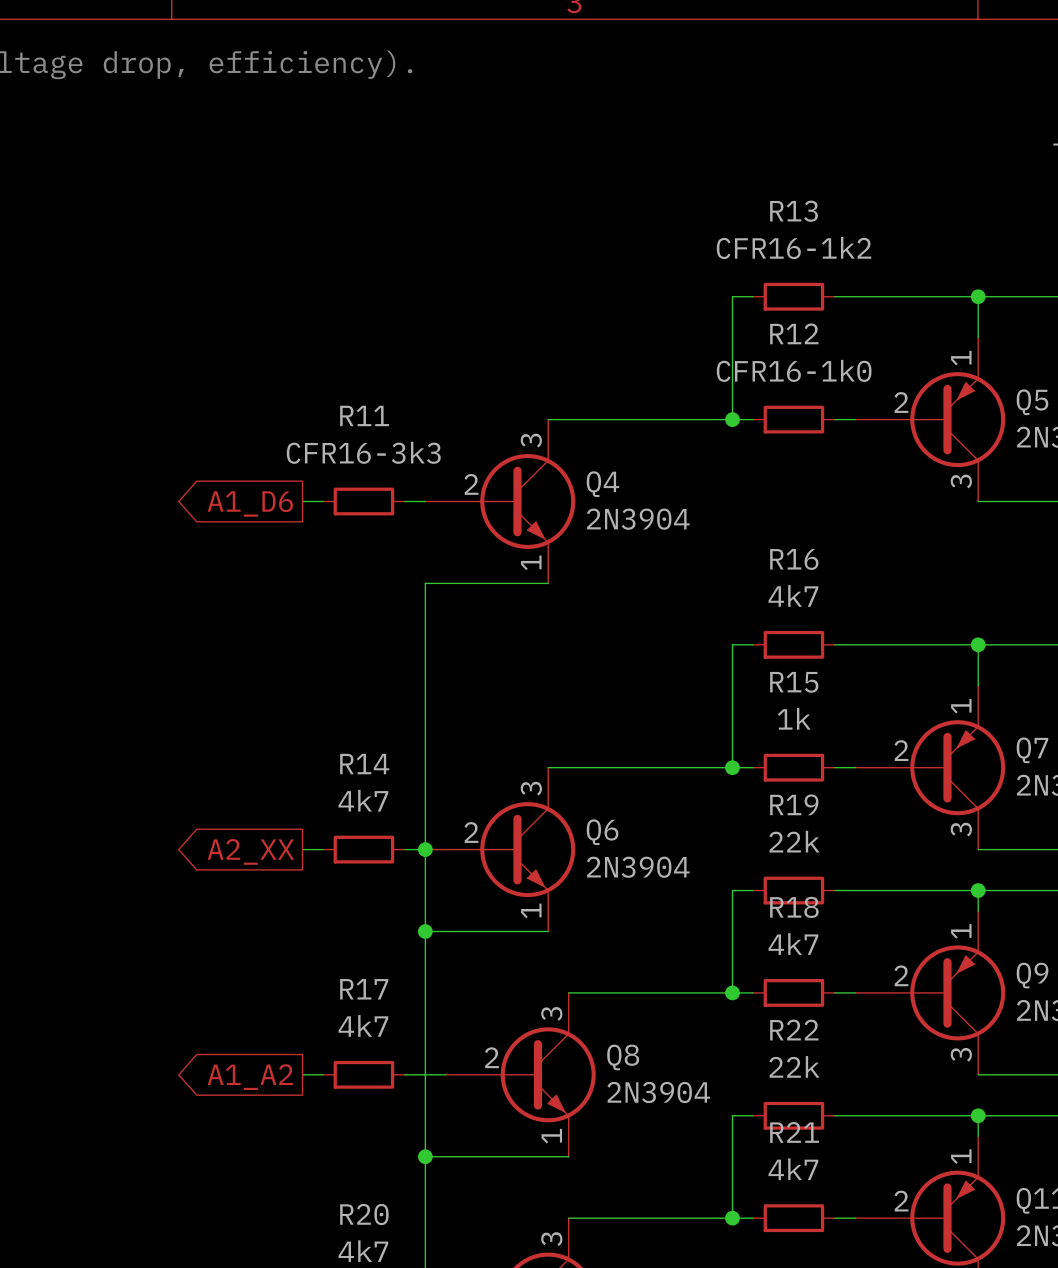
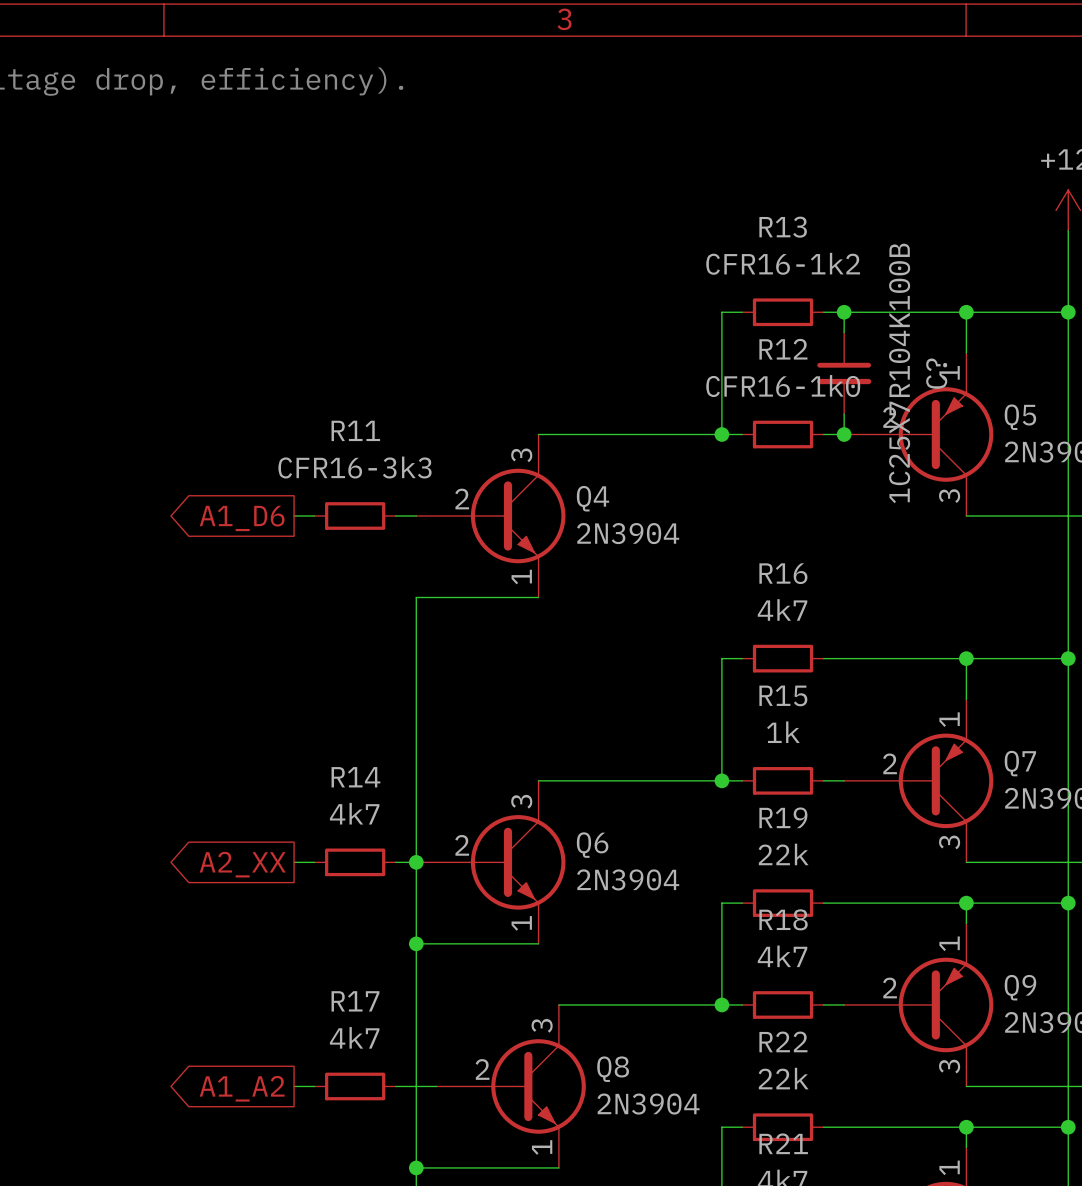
wire: none -> (844, 312) (844, 332)
junction: none -> (844, 312)
C?: none -> 1C25X7R104K100B (844, 373)
wire: none -> (844, 414) (844, 434)
junction: none -> (844, 434)

